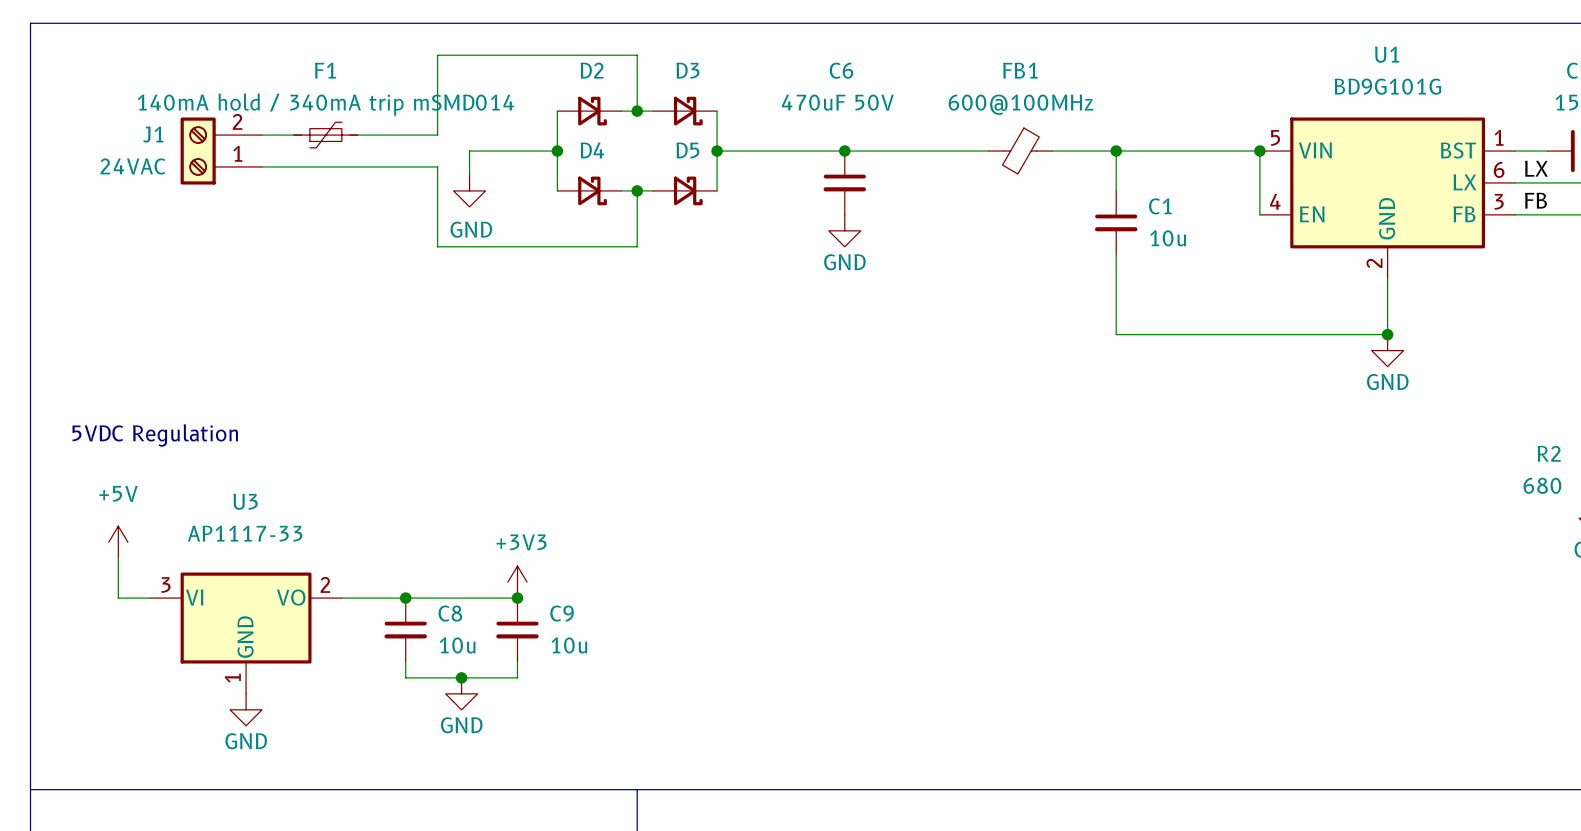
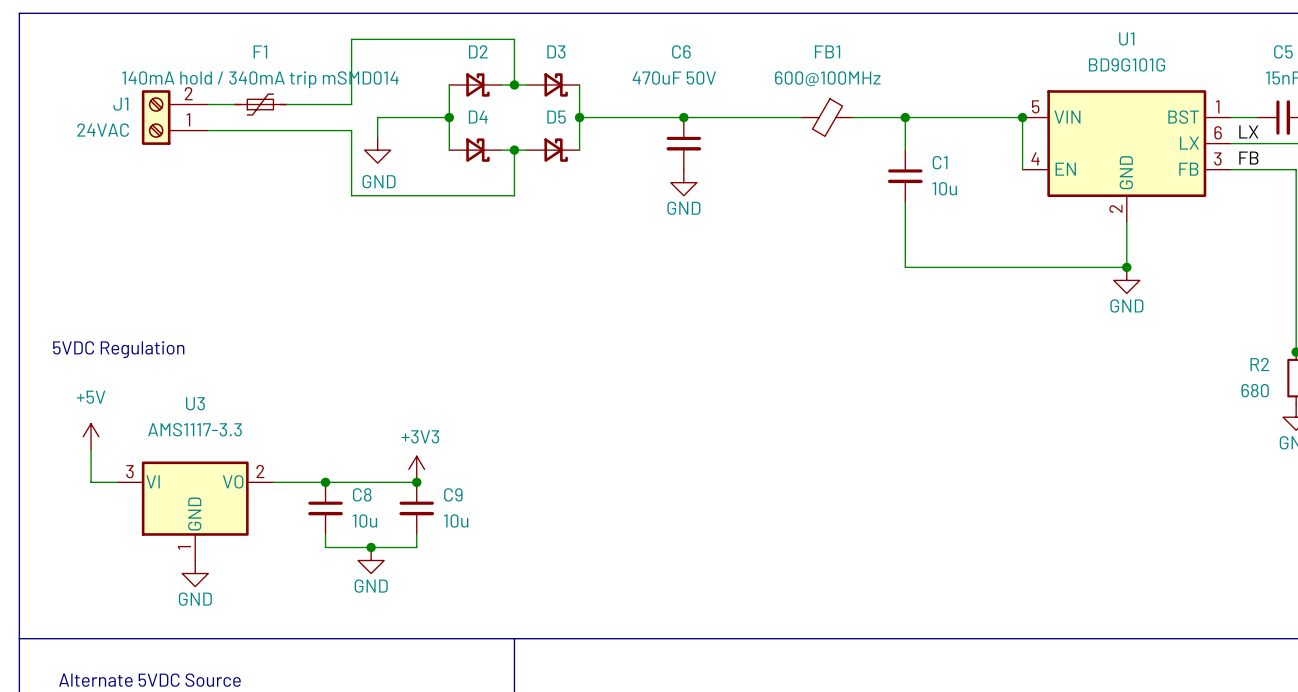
U3 value: AP1117-33 (245, 533) -> AMS1117-3.3 (194, 429)

